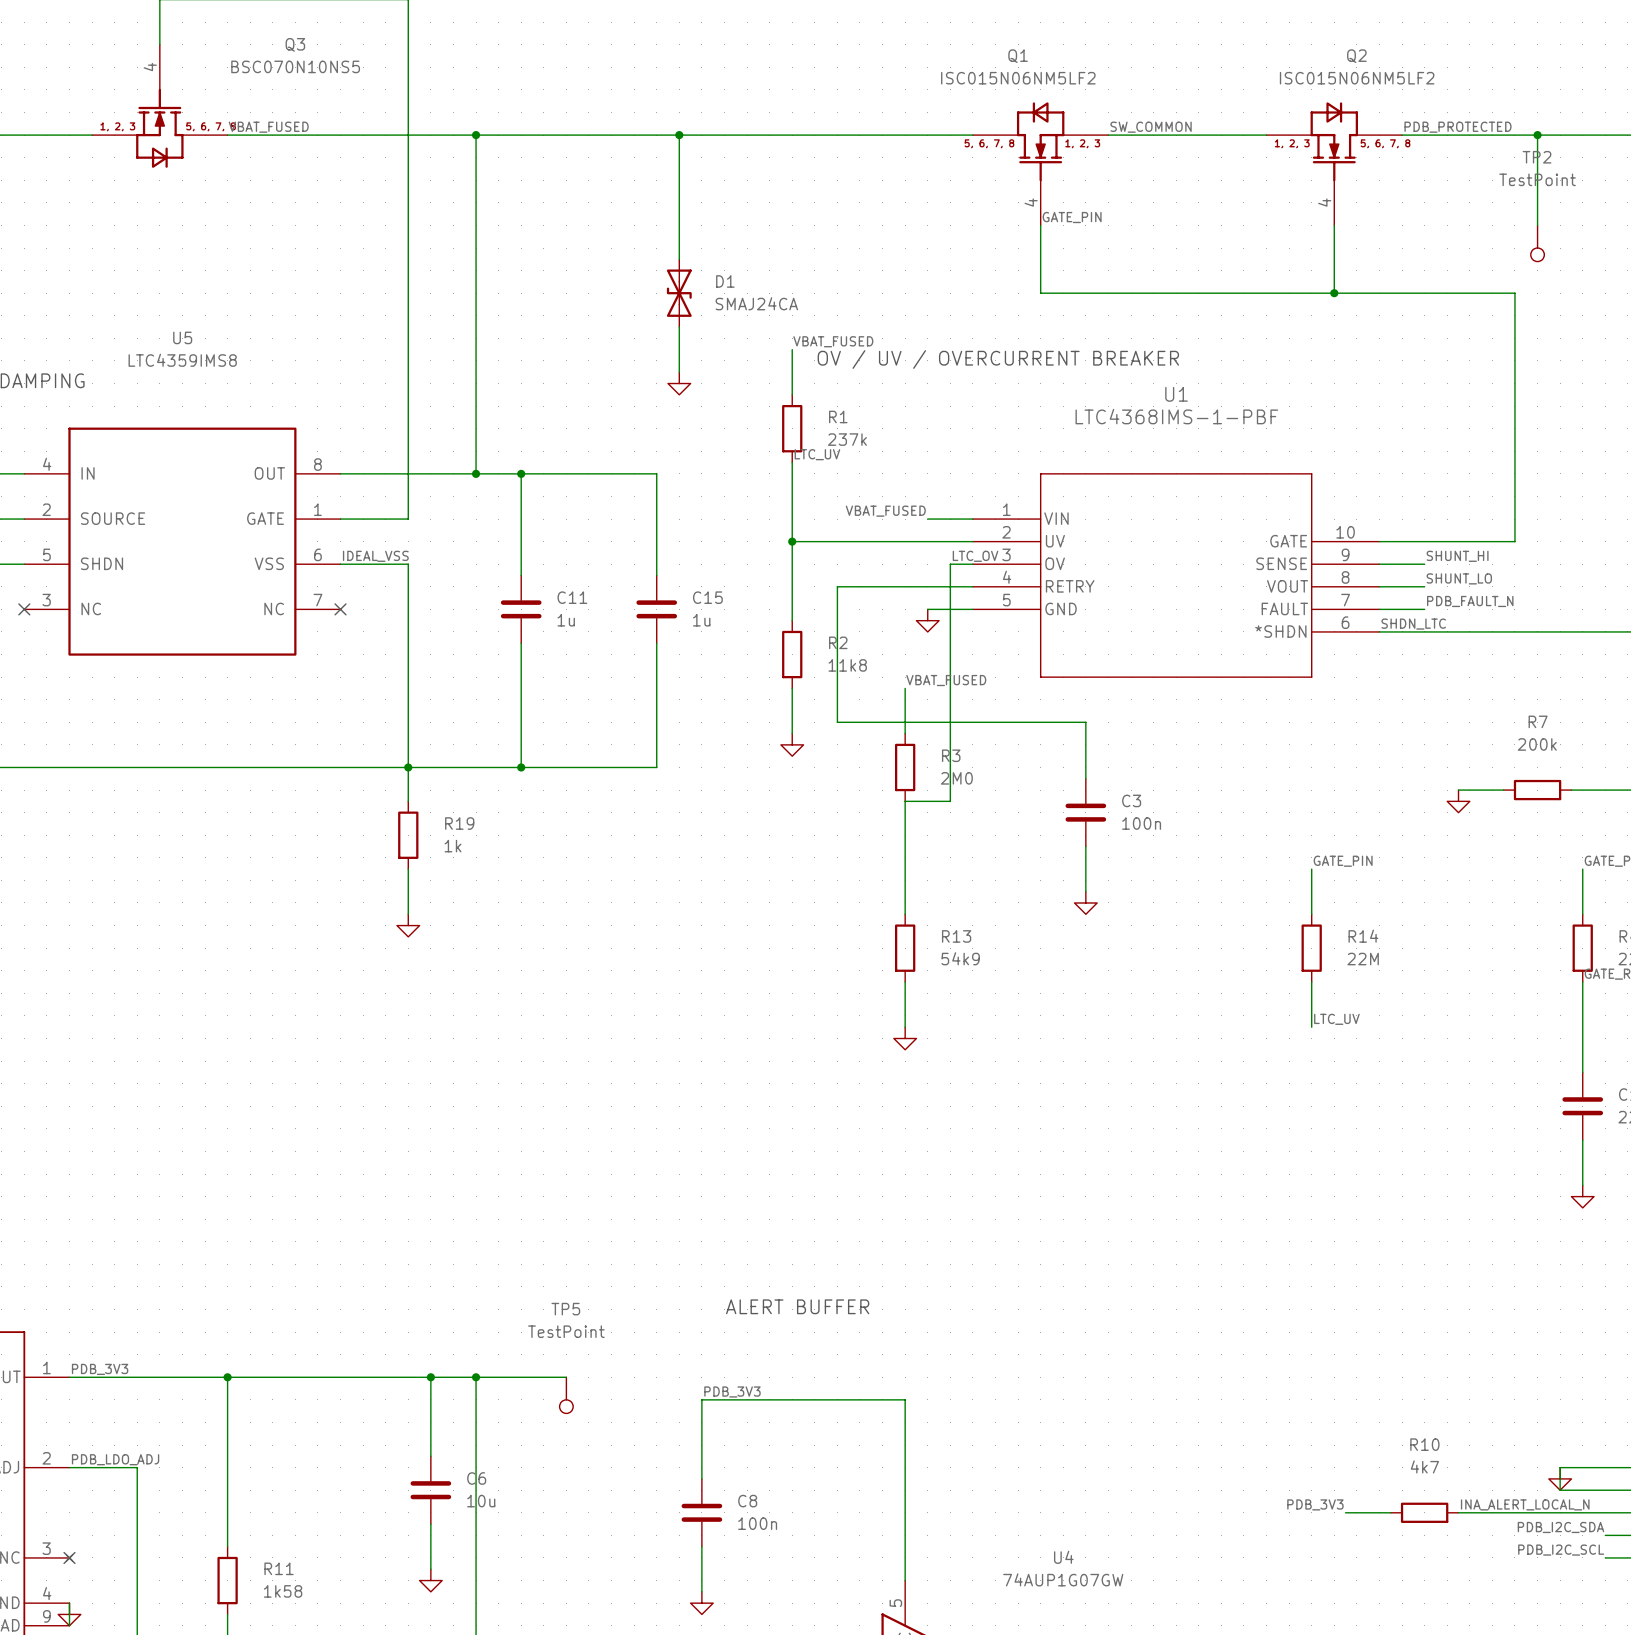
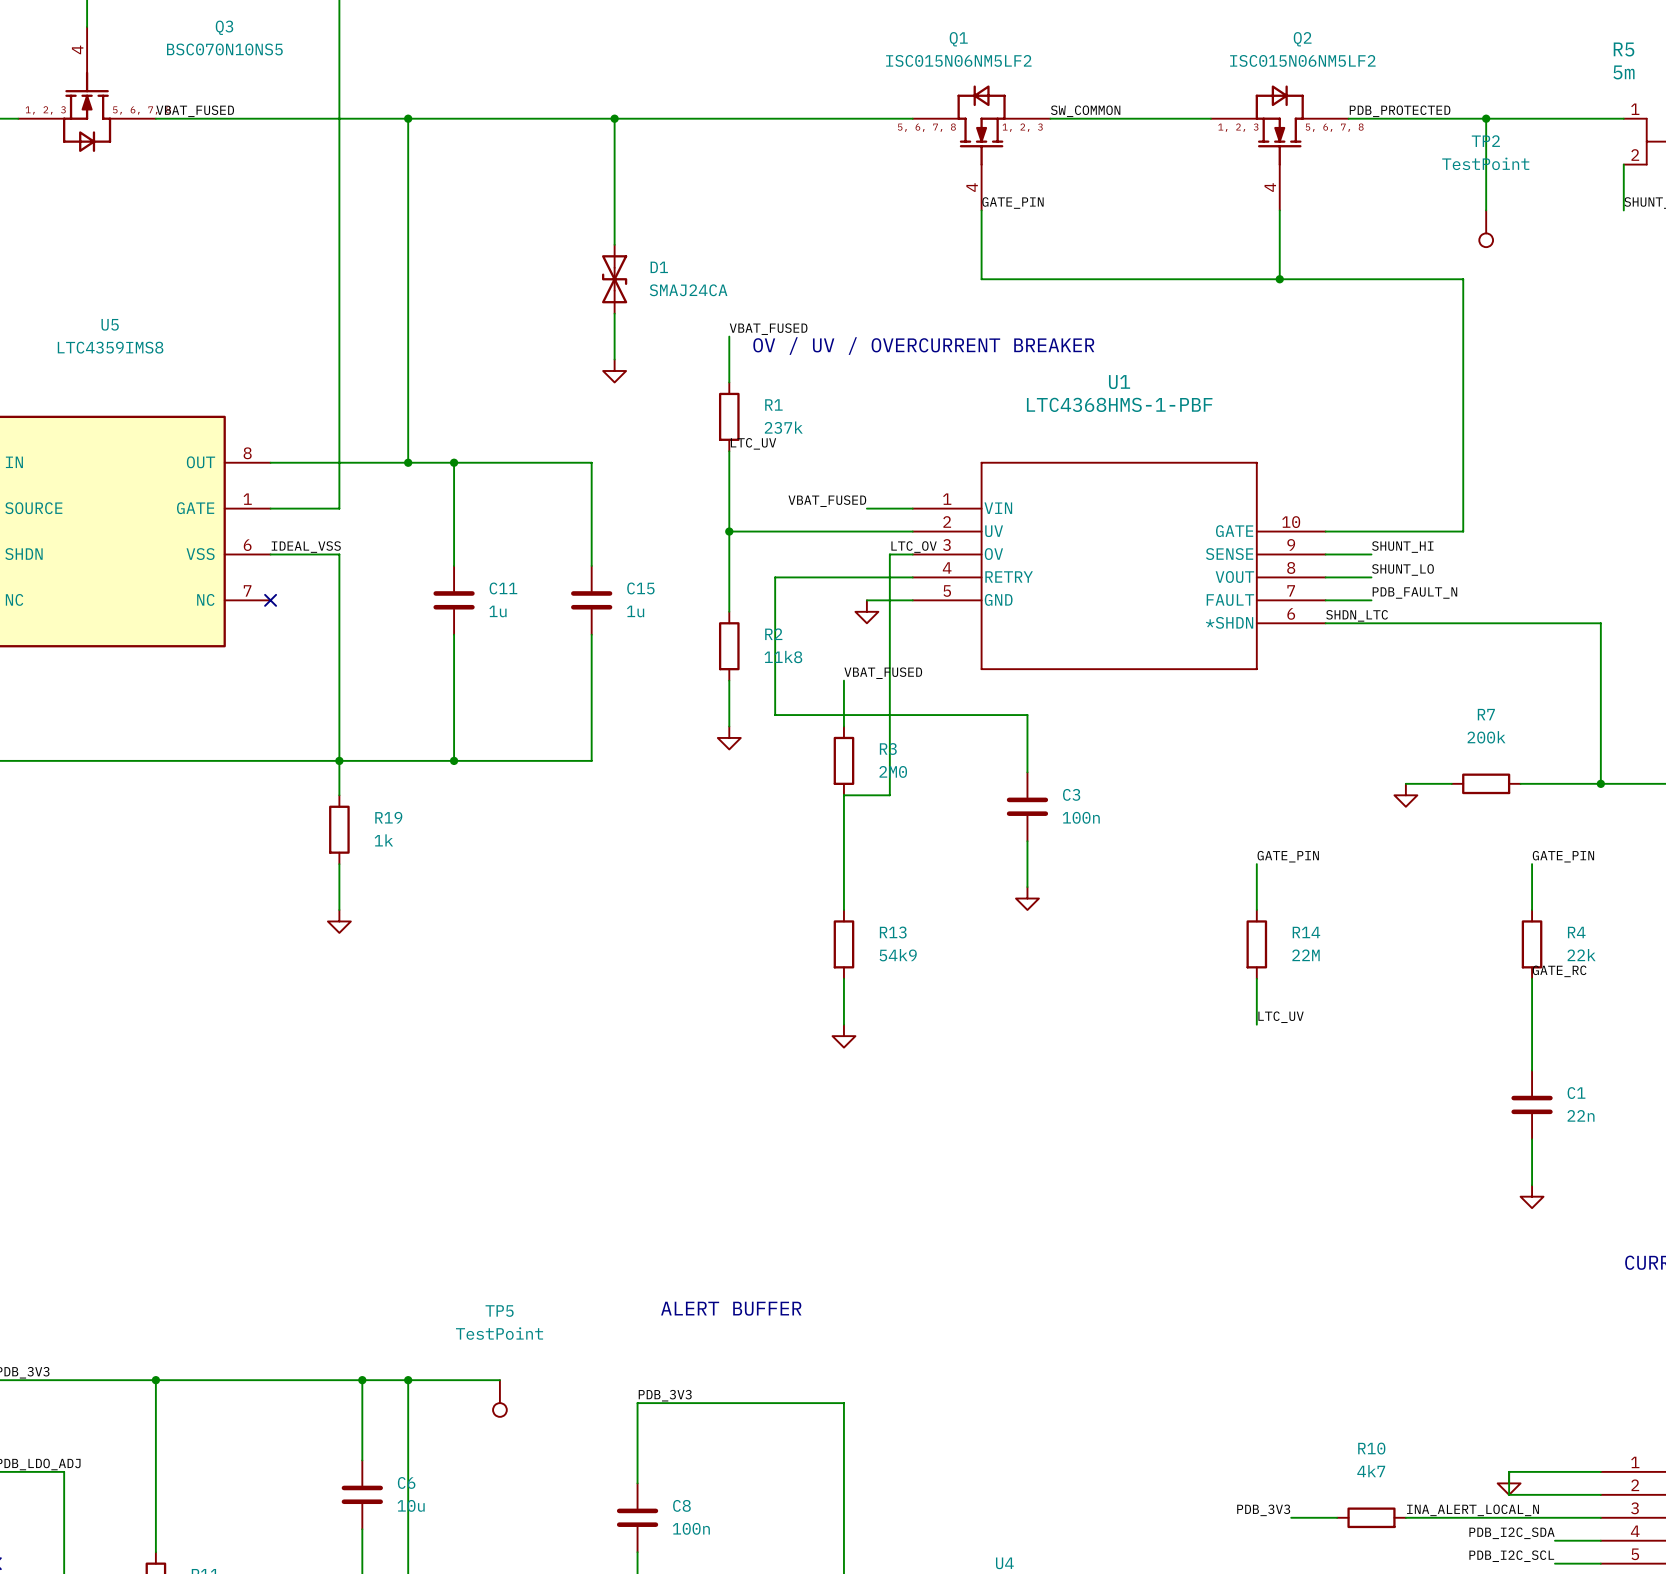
U1 value: LTC4368IMS-1-PBF (1176, 416) -> LTC4368HMS-1-PBF (1119, 404)

